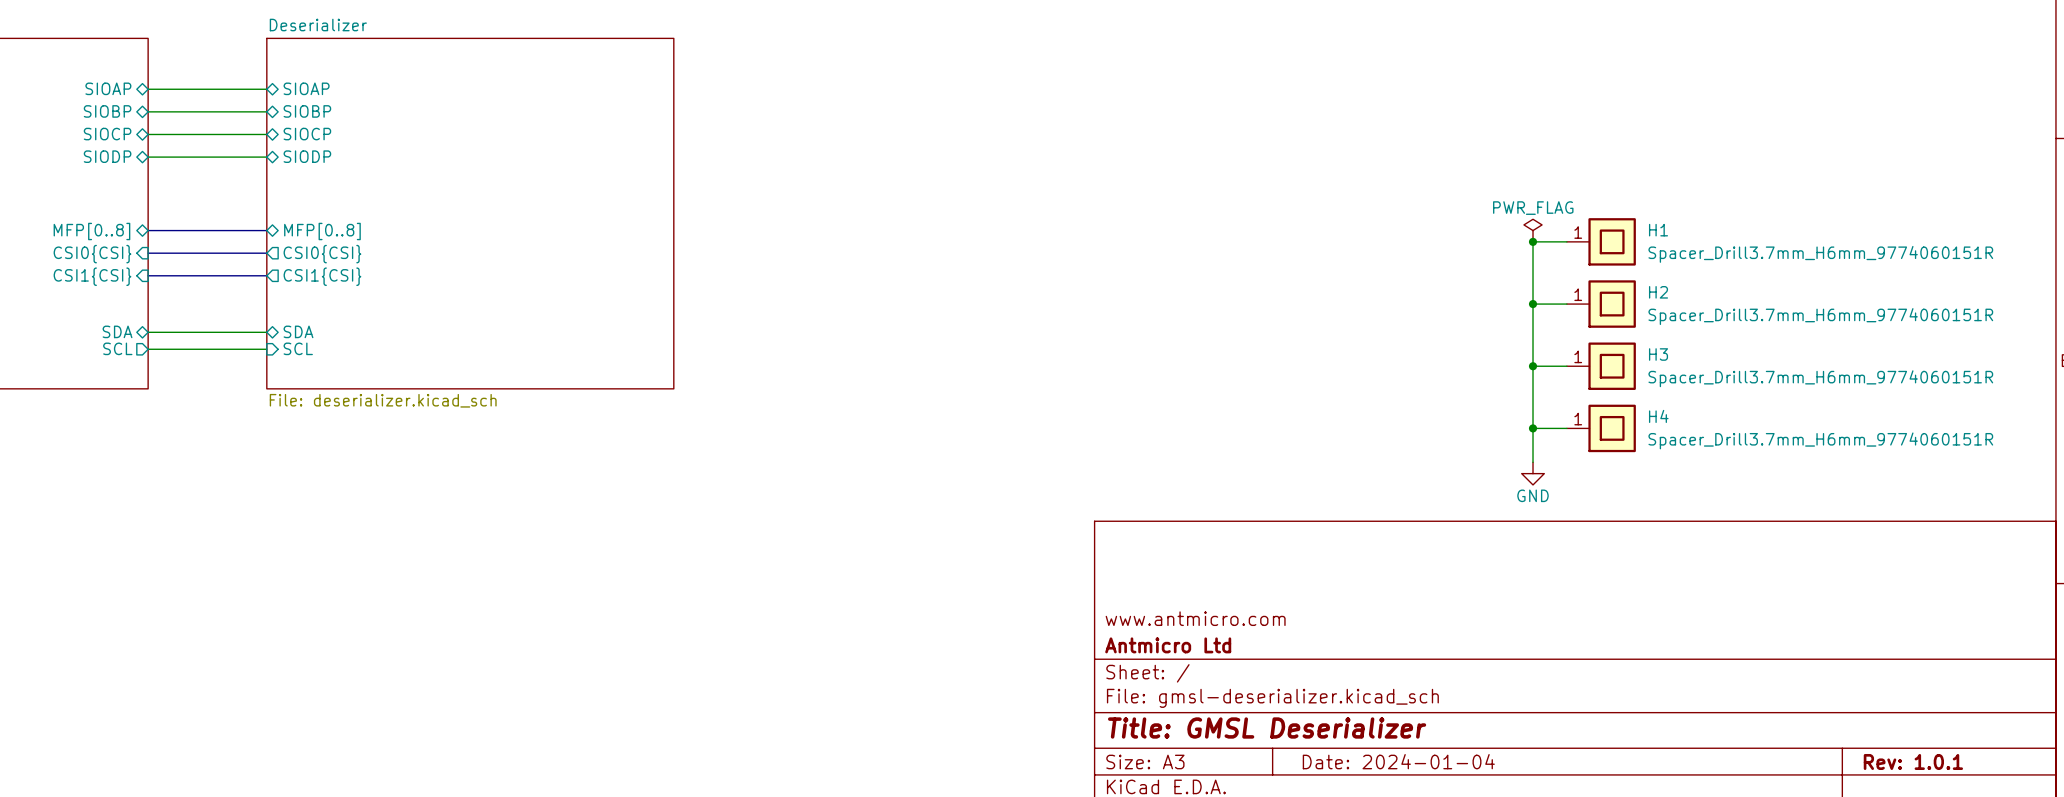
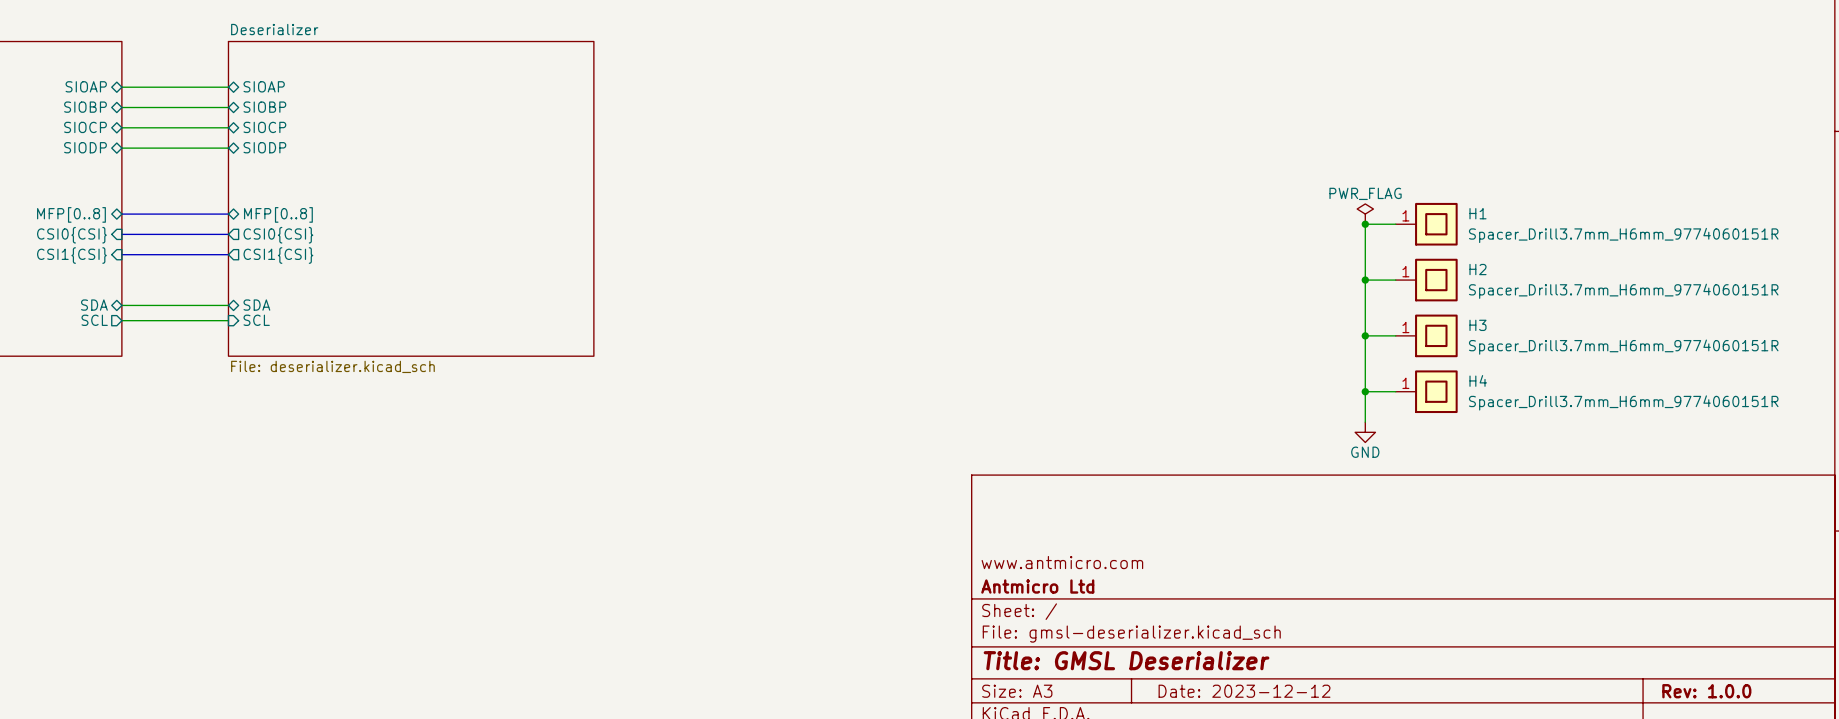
title block: Date: 2024-01-04 (1398, 761) -> Date: 2023-12-12 (1244, 691)
title block: Rev: 1.0.1 (1913, 761) -> Rev: 1.0.0 (1706, 691)

